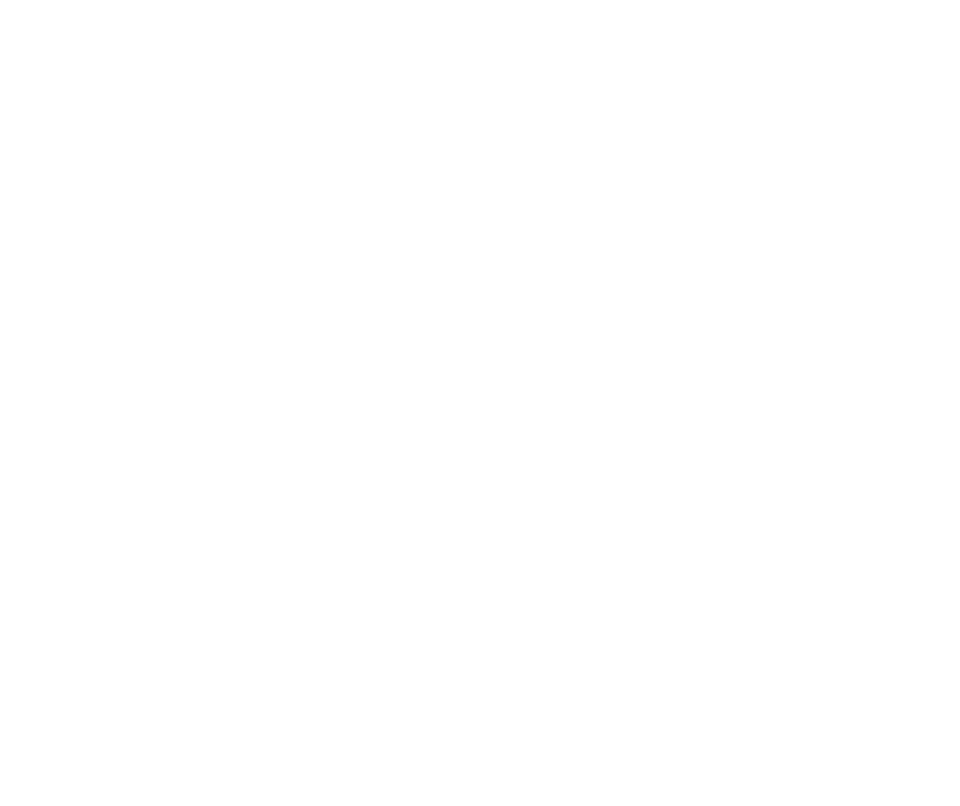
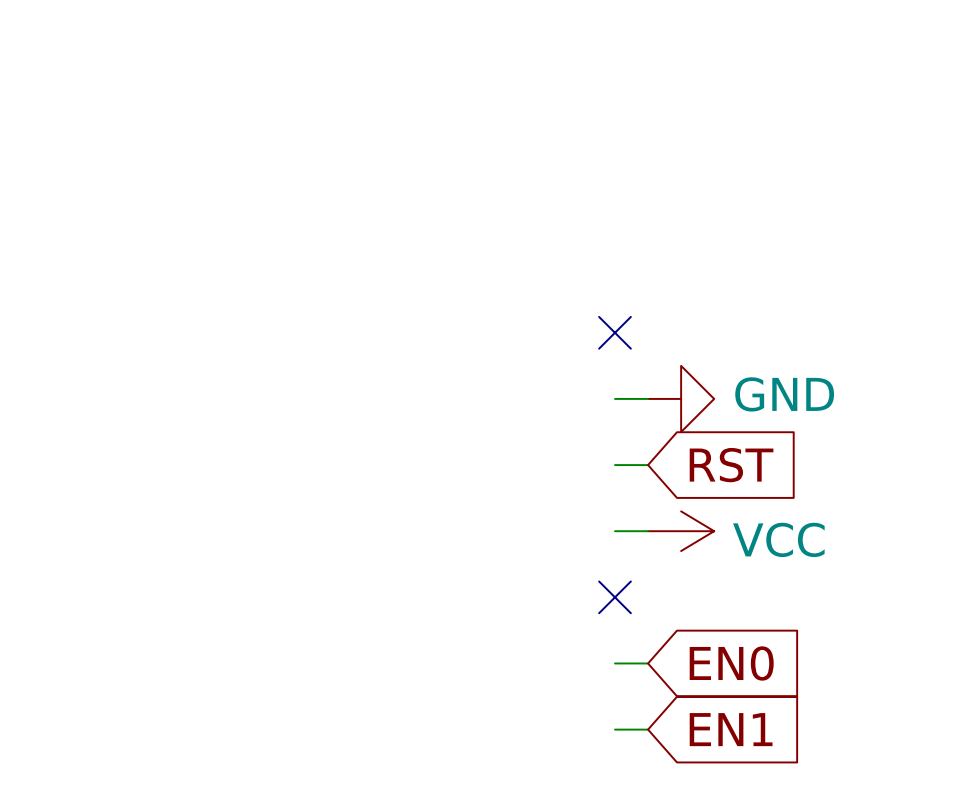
no-connect mark: none -> (614, 332)
wire: none -> (614, 398) (648, 398)
power symbol: none -> GND (681, 398)
wire: none -> (614, 465) (648, 465)
global label: none -> RST (731, 465)
wire: none -> (614, 531) (648, 531)
power symbol: none -> VCC (681, 531)
no-connect mark: none -> (614, 597)
wire: none -> (614, 663) (648, 663)
global label: none -> EN0 (731, 663)
wire: none -> (614, 729) (648, 729)
global label: none -> EN1 (731, 729)

